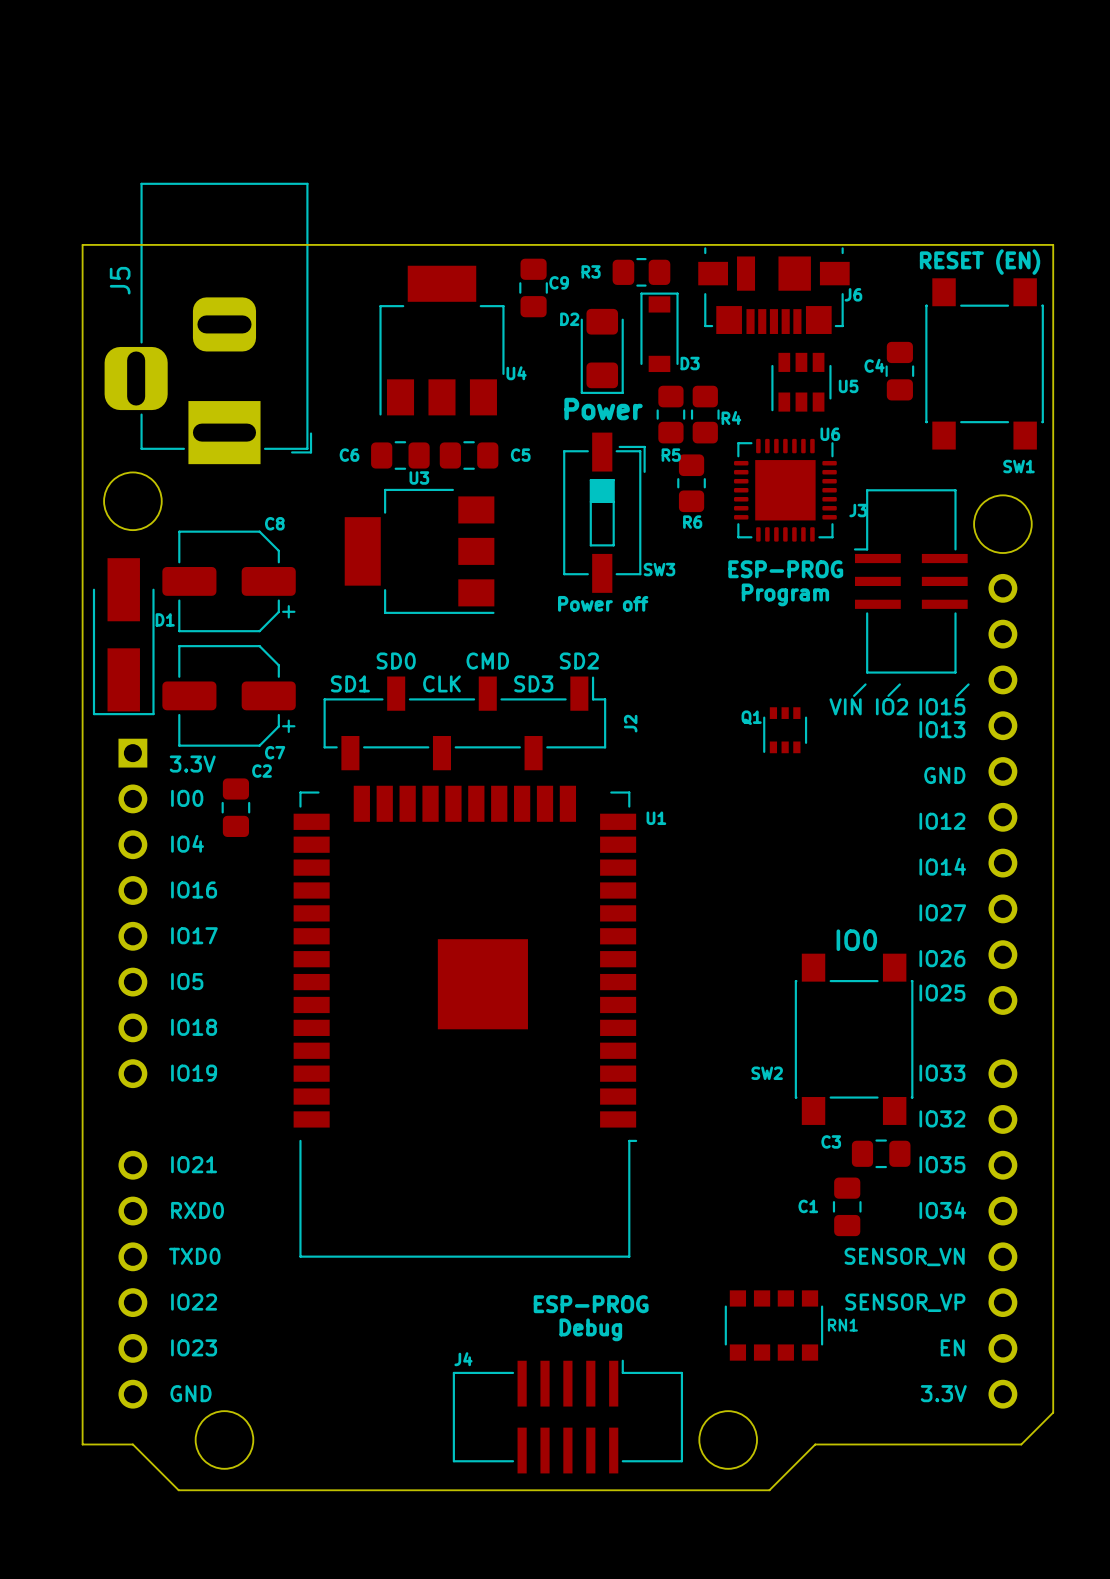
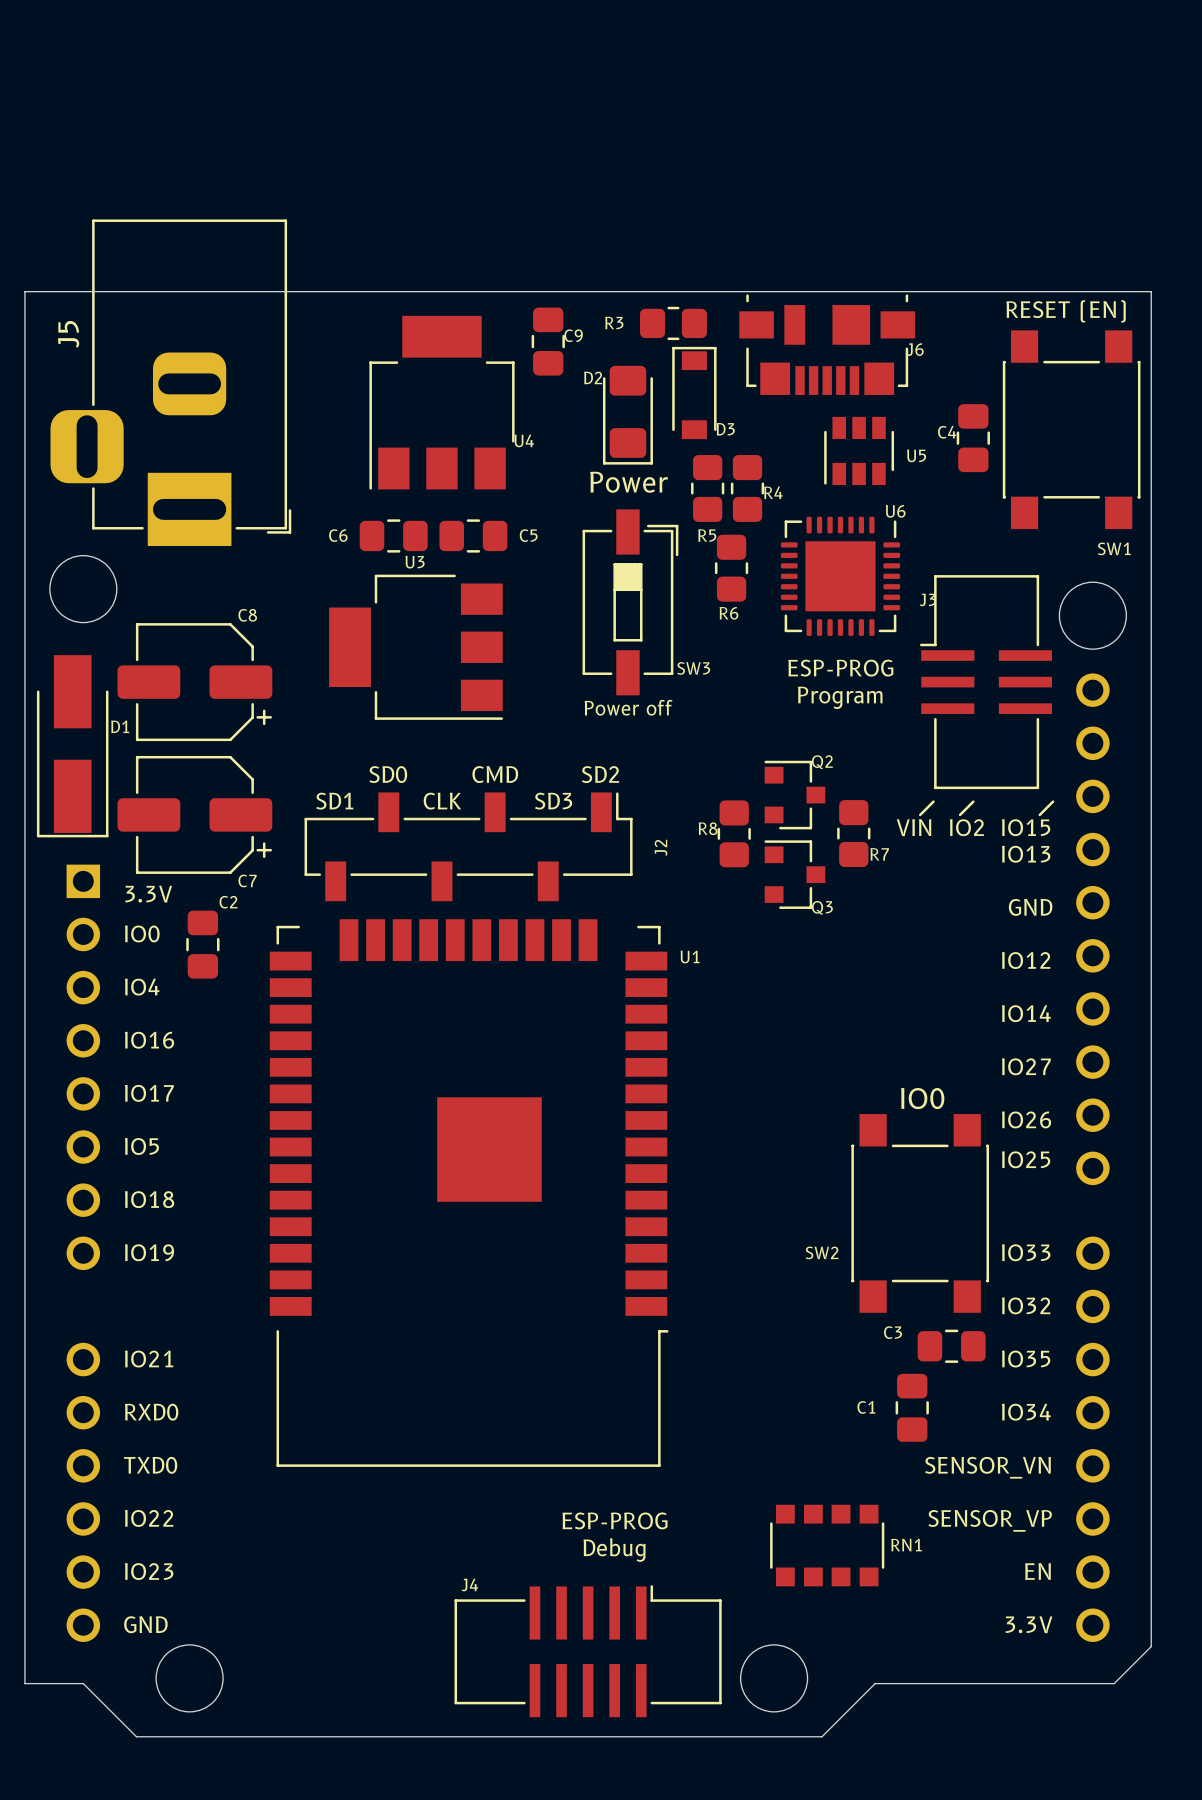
Q2: none -> (794, 795)
R7: none -> (853, 833)
R8: none -> (734, 833)
Q1: (785, 730) -> none
Q3: none -> (794, 874)

